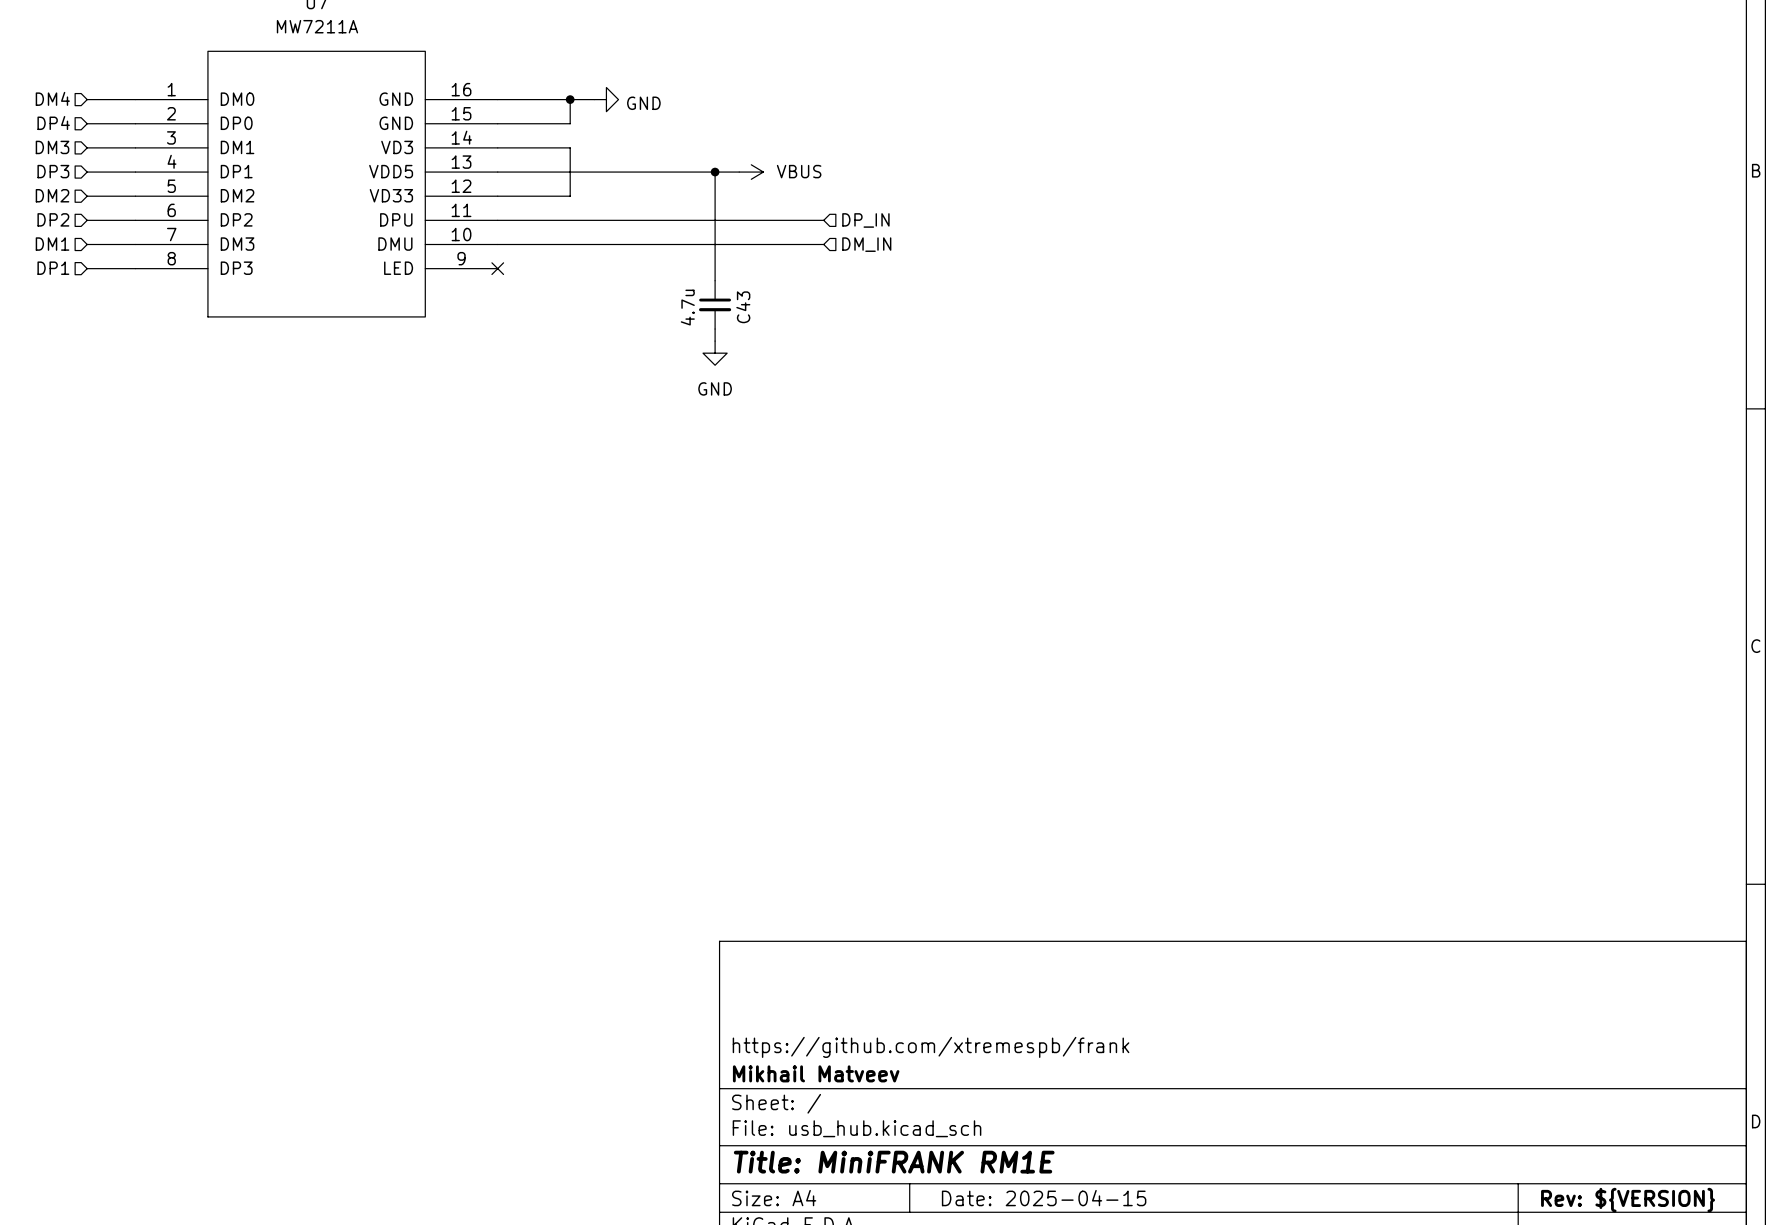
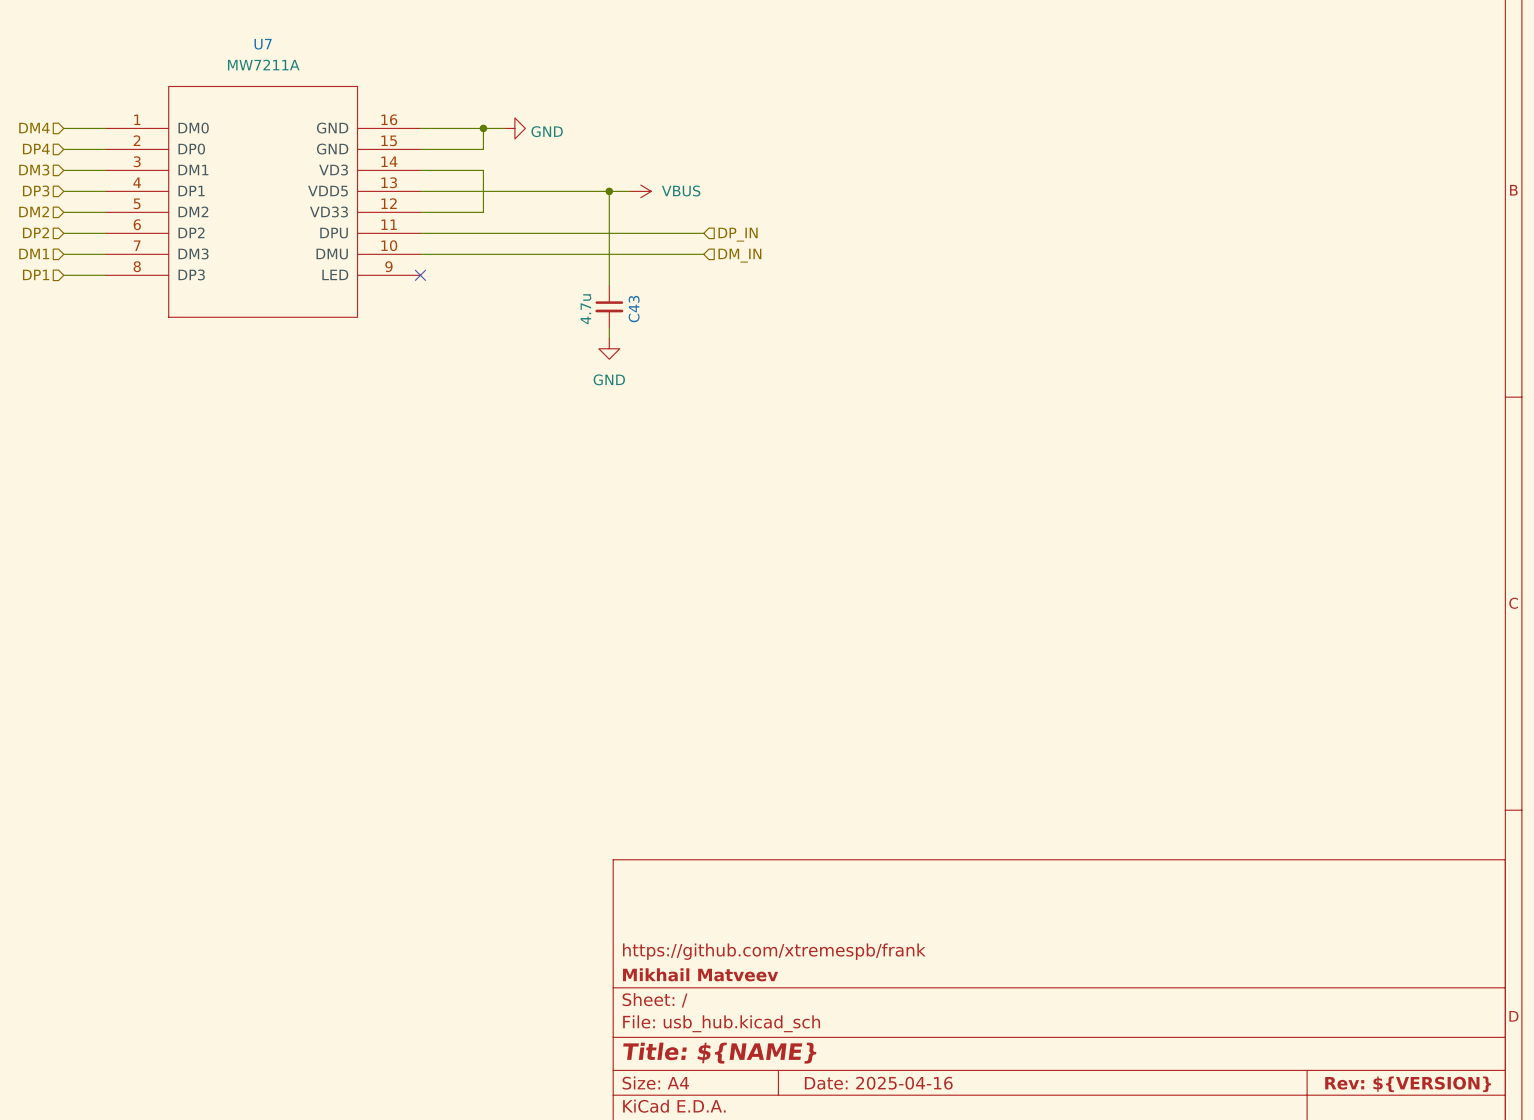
title block: Title: MiniFRANK RM1E (894, 1162) -> Title: ${NAME} (719, 1053)
title block: Date: 2025-04-15 (1044, 1198) -> Date: 2025-04-16 (878, 1083)

